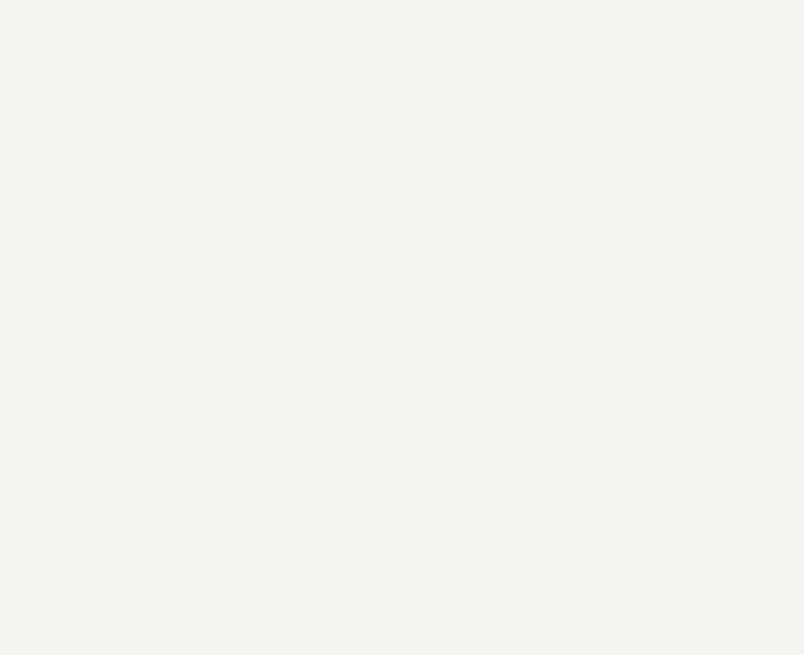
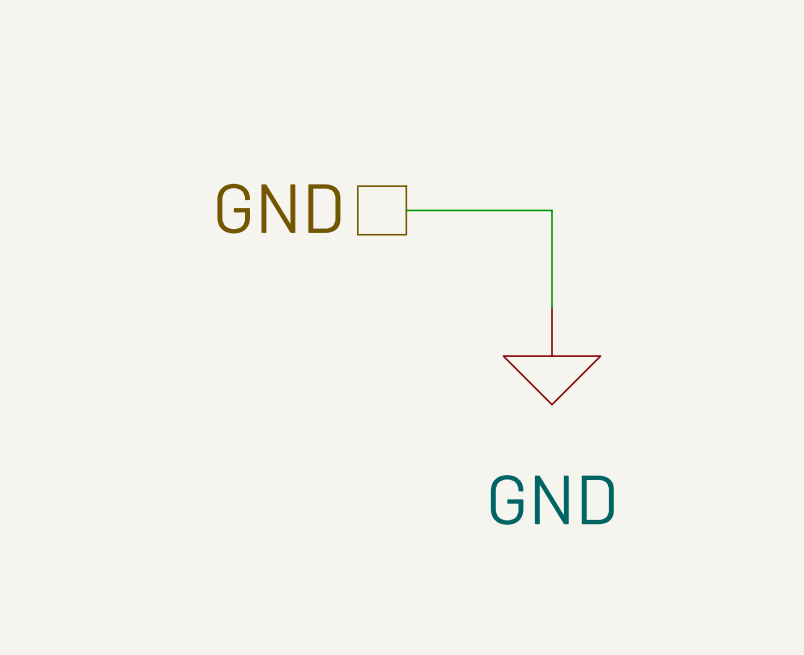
hierarchical label: none -> GND (278, 208)
wire: none -> (406, 210) (551, 210) (551, 307)
power symbol: none -> GND (551, 356)

